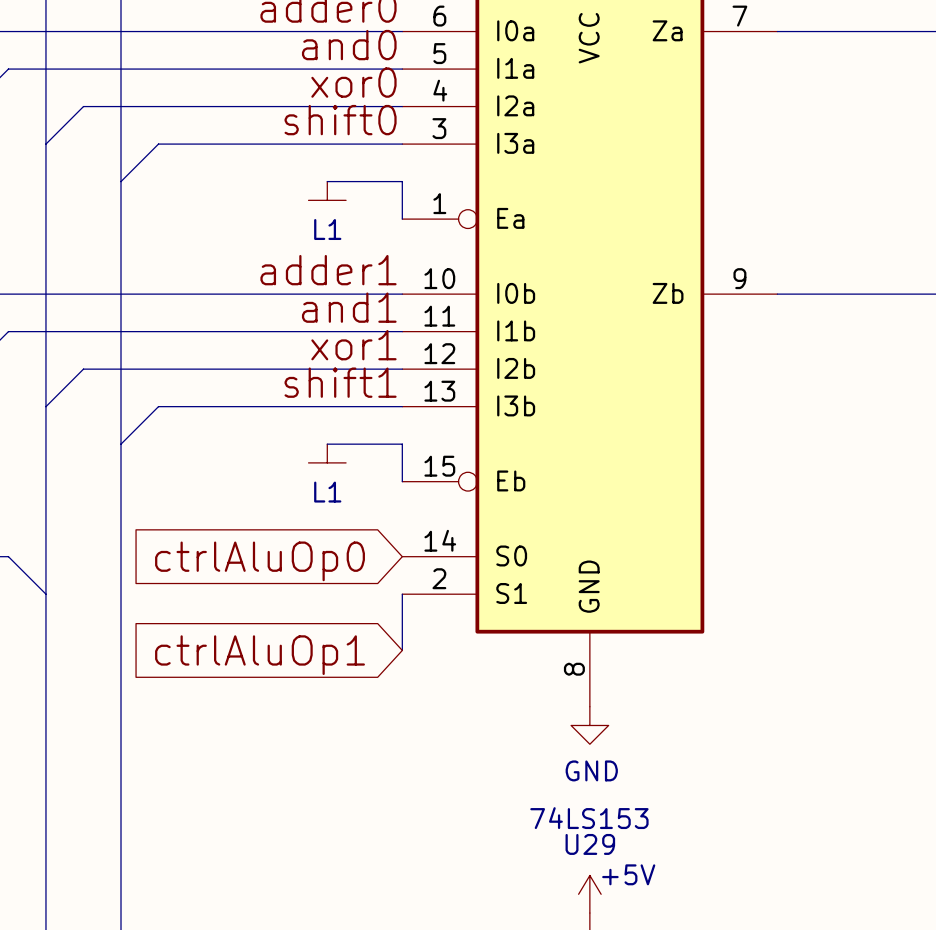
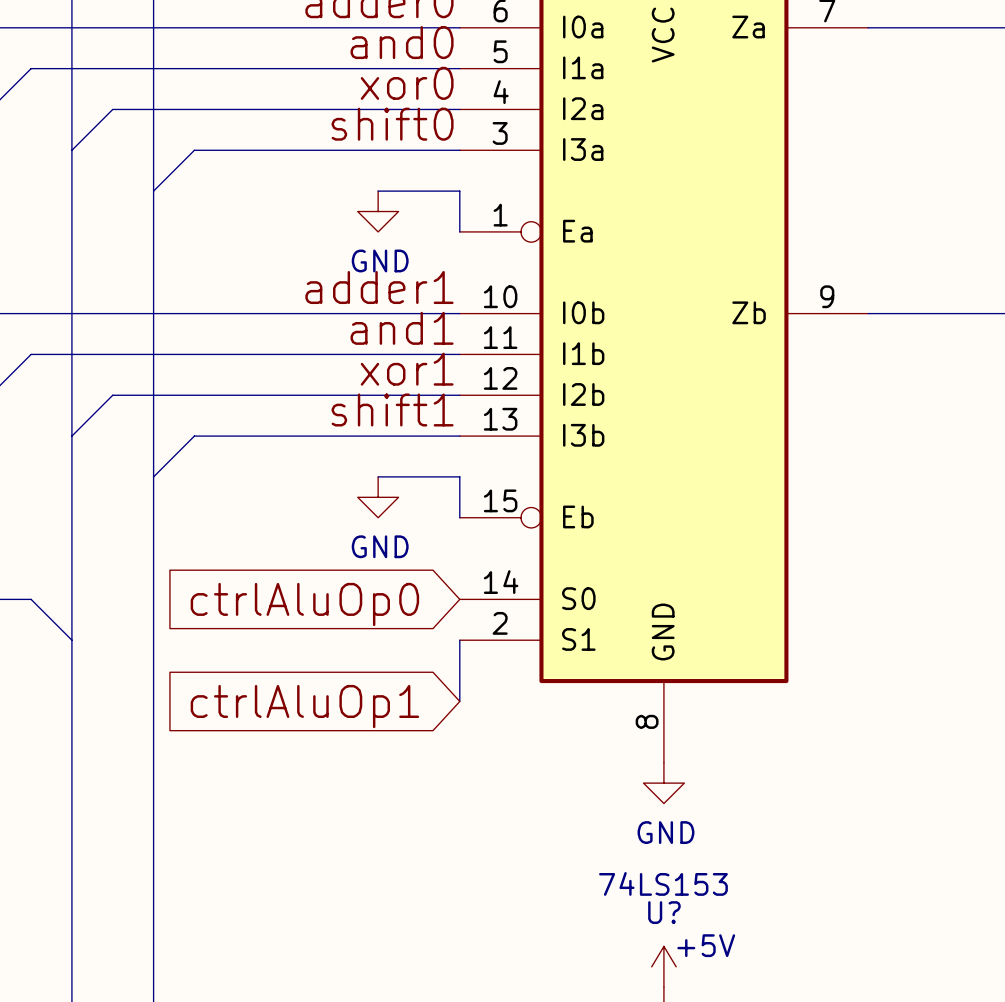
power symbol: L1 (327, 190) -> GND (378, 211)
power symbol: L1 (327, 453) -> GND (378, 497)
U29 name: U29 (590, 844) -> U? (664, 912)

